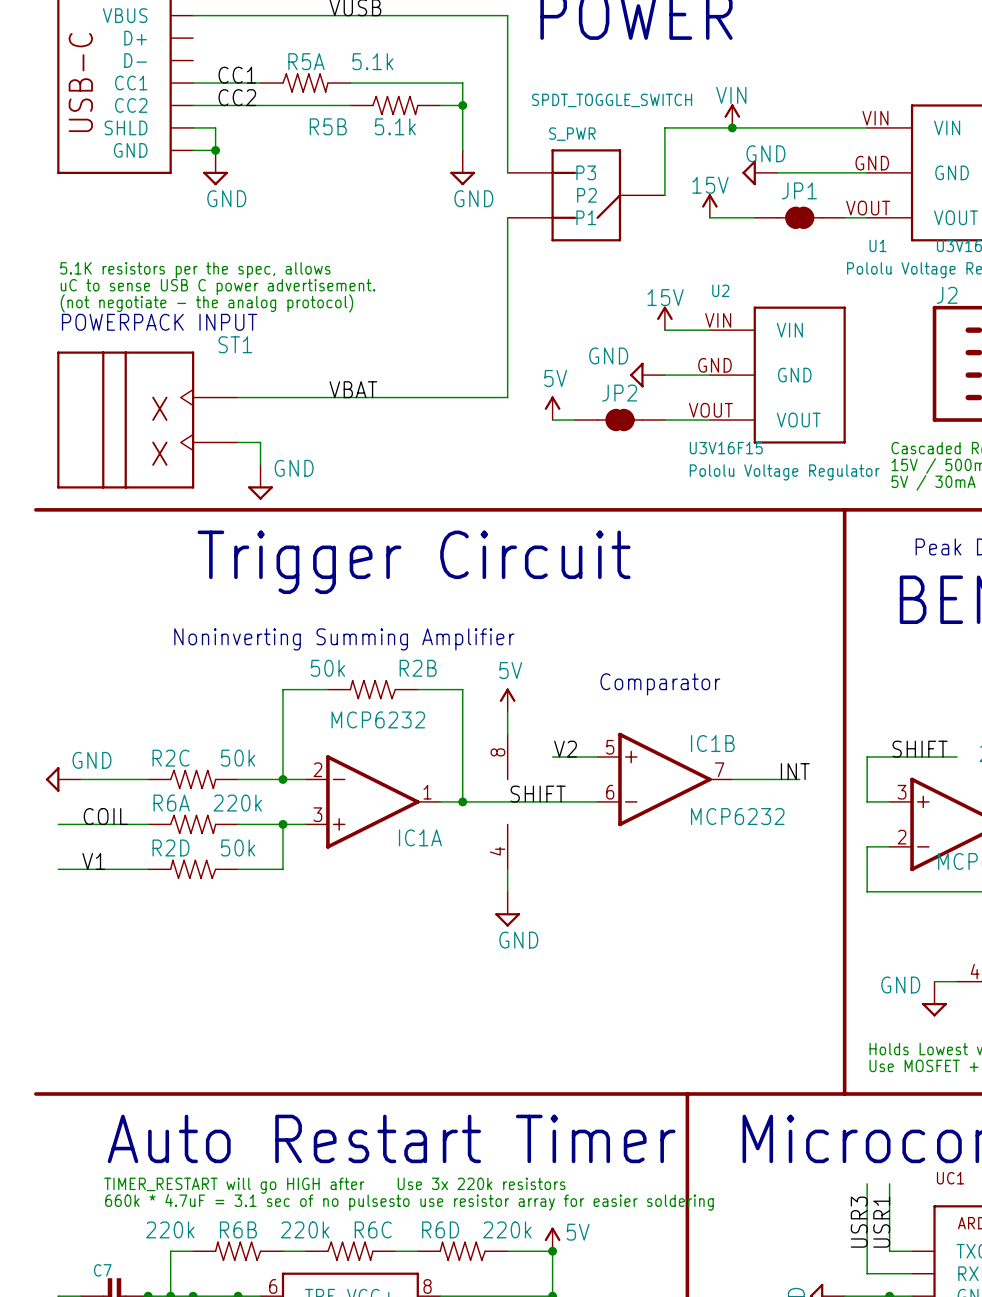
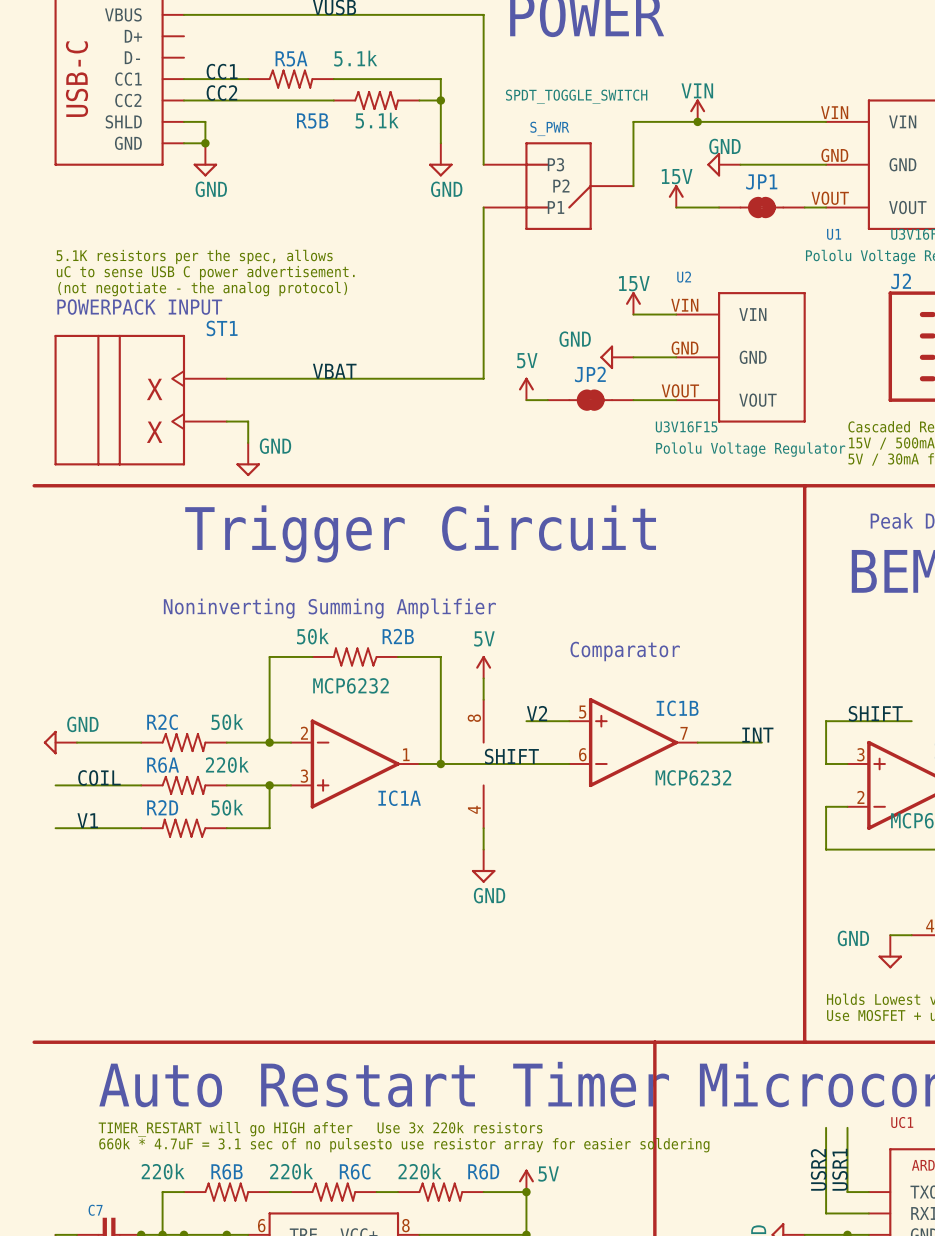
label: USR3 (859, 1222) -> USR2 (818, 1169)
R6D name position: R6D (440, 1229) -> R6D (483, 1171)
R6D value position: 220k (507, 1229) -> 220k (419, 1171)
R6B rotation: 0° (238, 1251) -> 180° (226, 1192)
R6D rotation: 0° (462, 1251) -> 180° (440, 1192)

